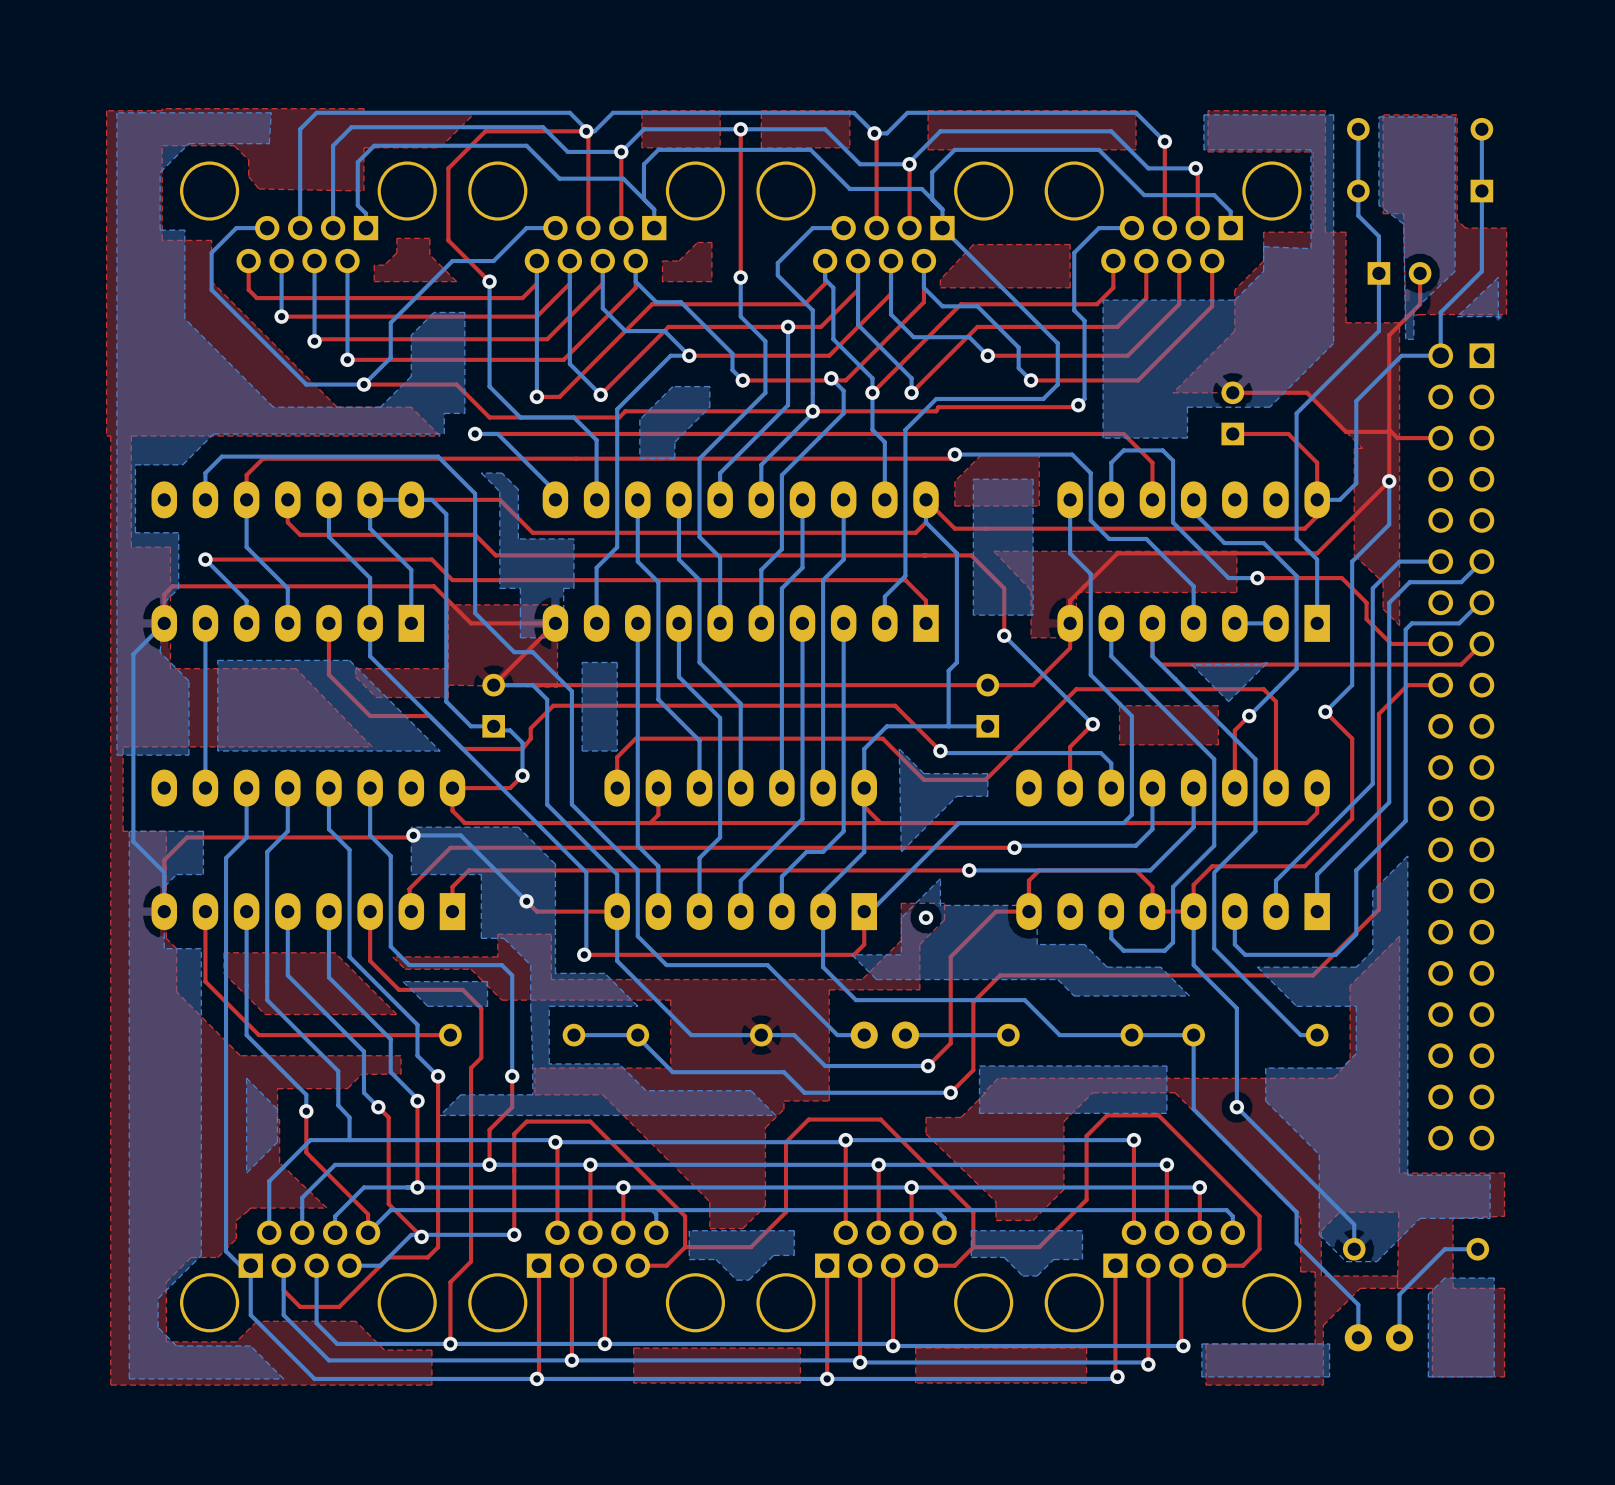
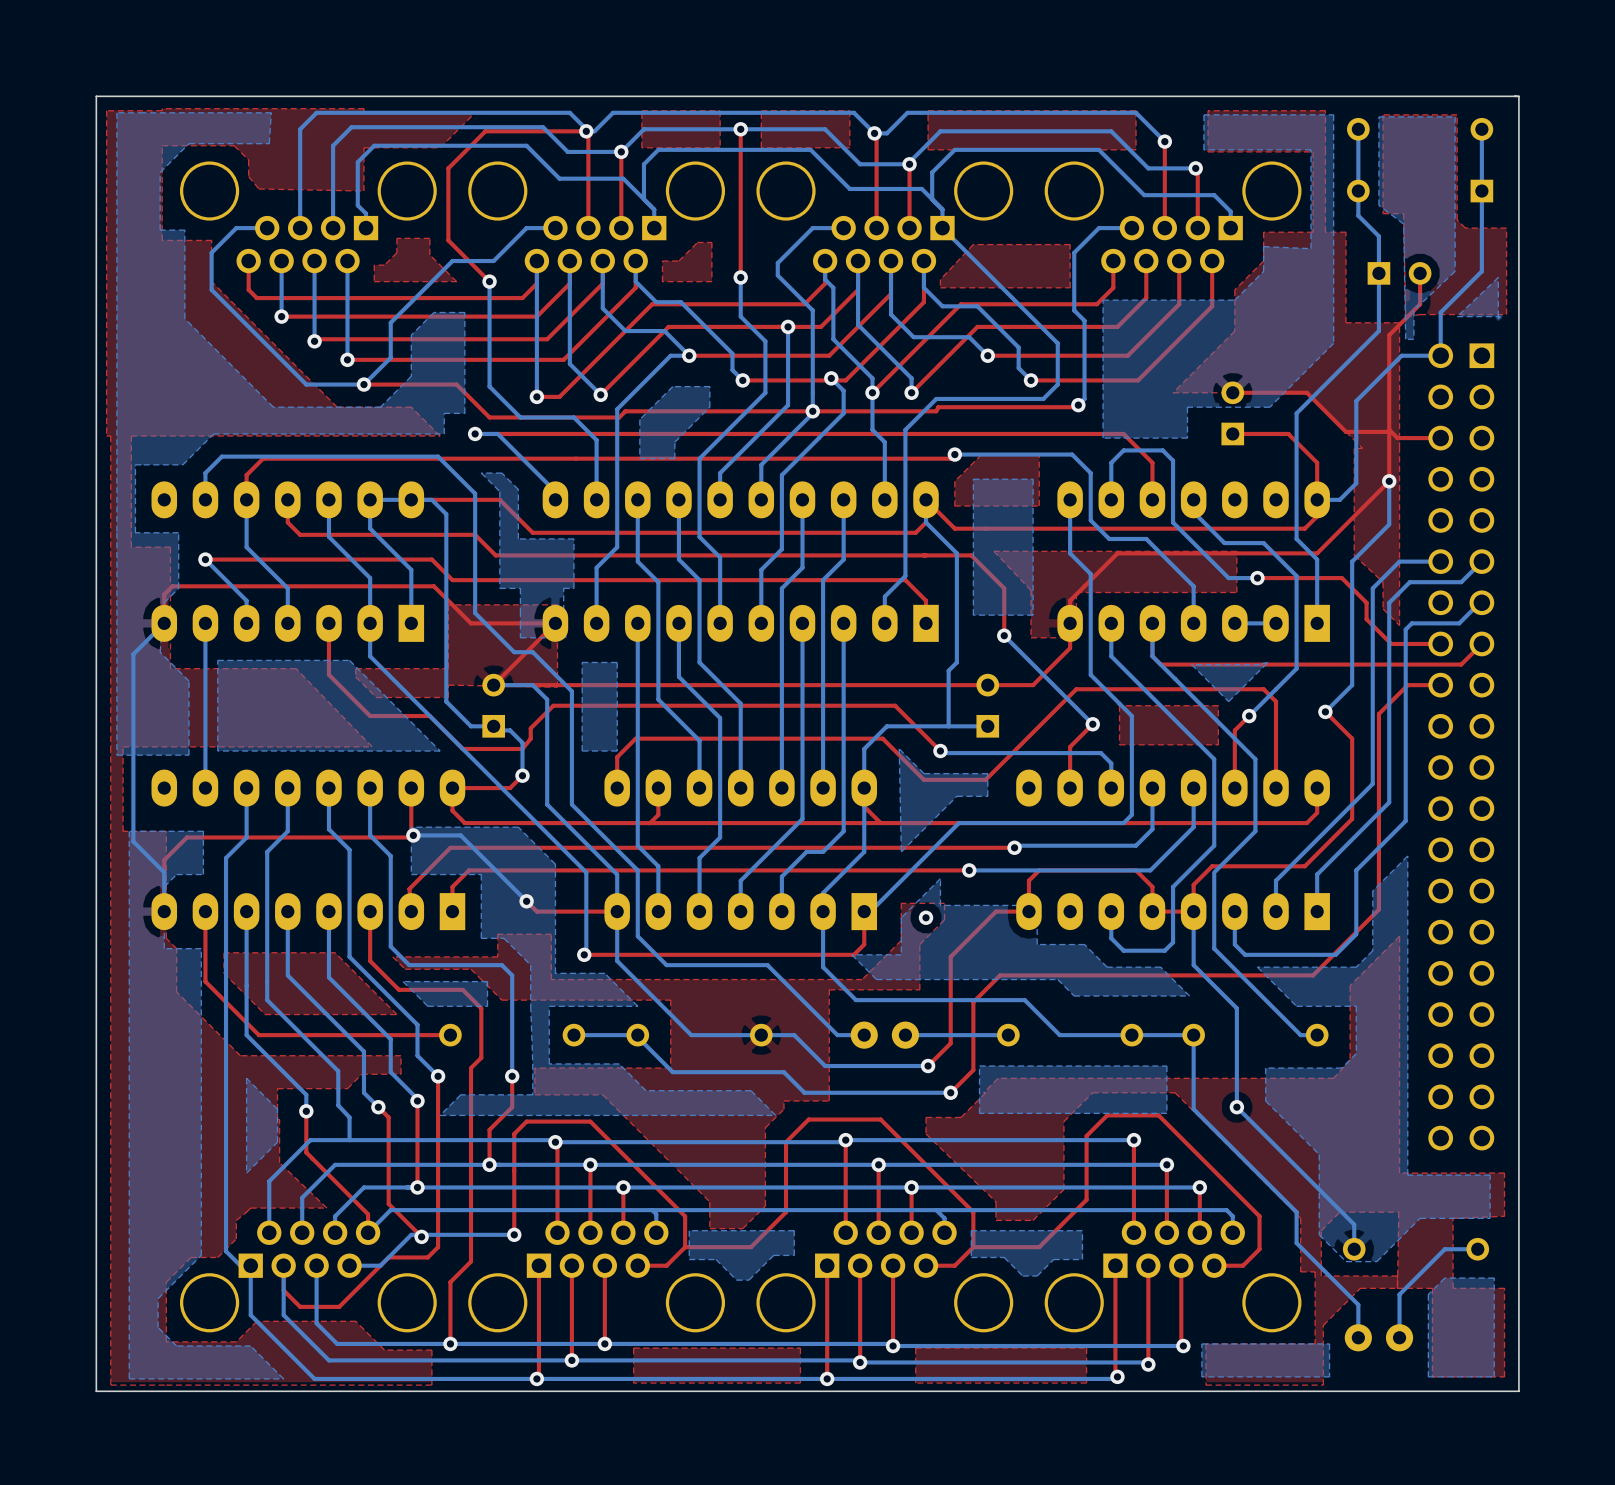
board edge: none -> (1518, 96) (96, 96) (96, 1391) (1518, 1391) (1518, 96)
top track: none -> (411, 788) (411, 833) (413, 835)

